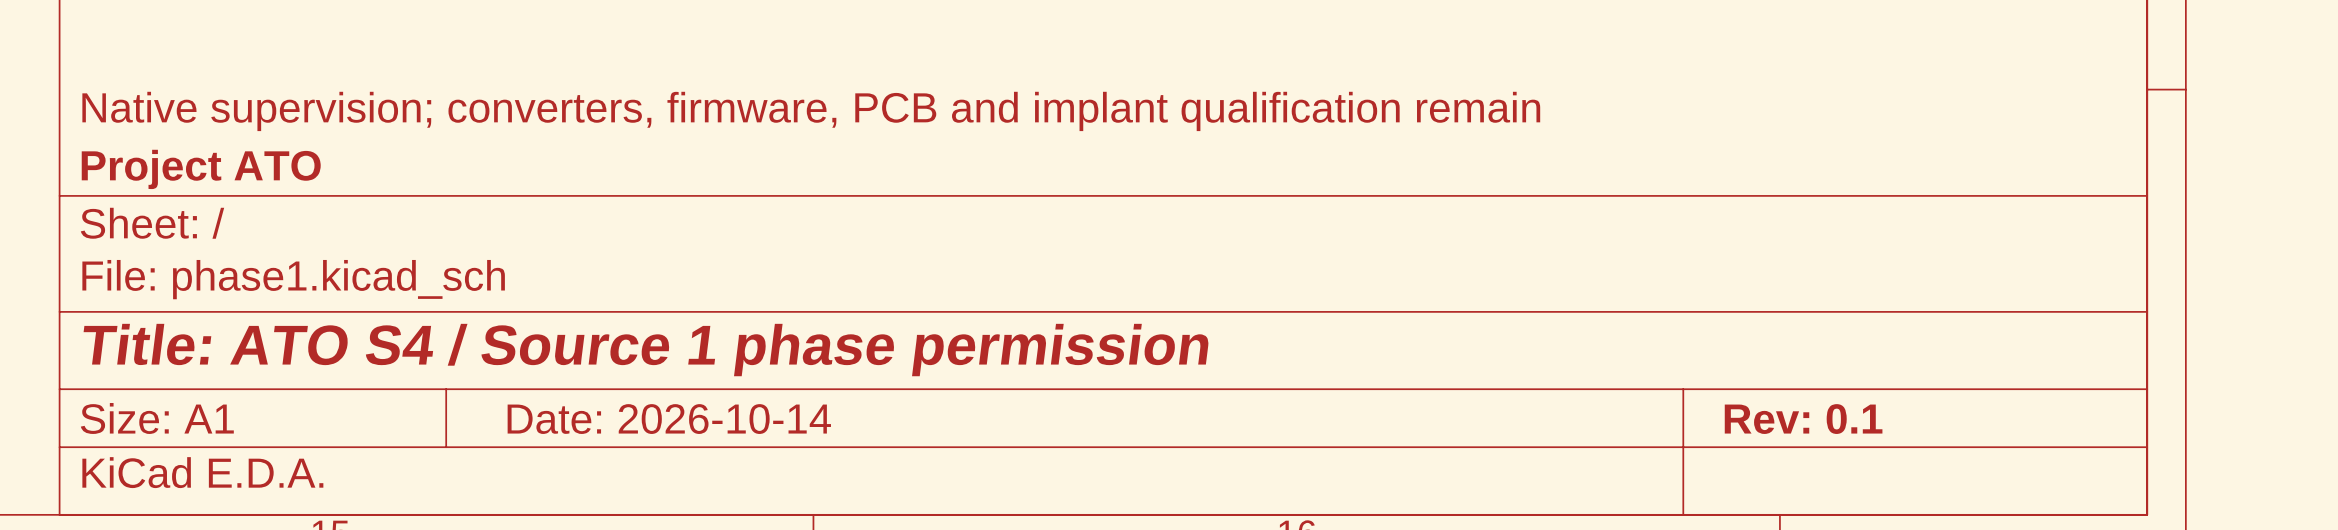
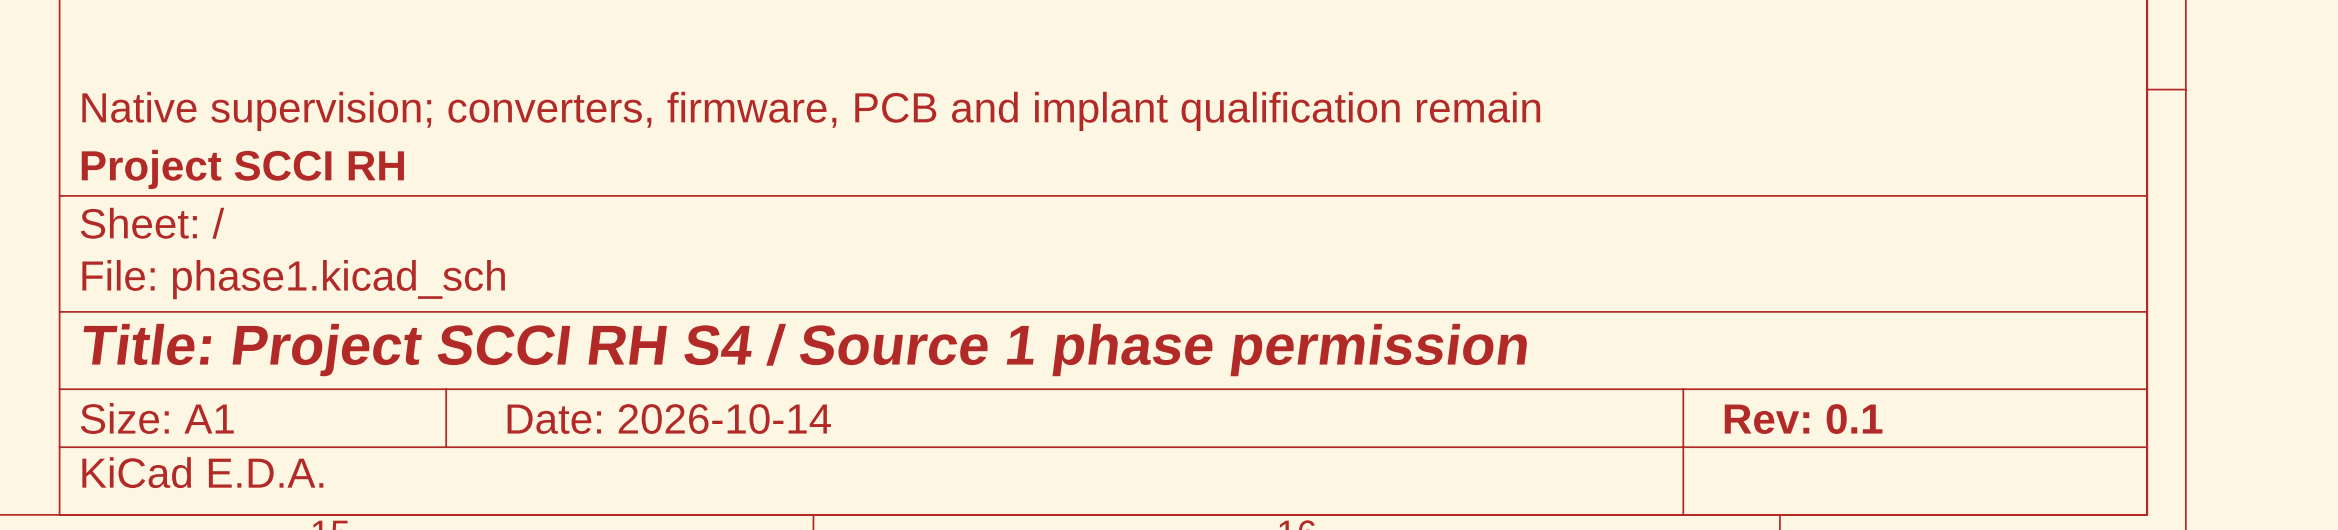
title block: Project ATO (201, 169) -> Project SCCI RH (242, 169)
title block: Title: ATO S4 / Source 1 phase permission (646, 350) -> Title: Project SCCI RH S4 / Source 1 phase permission (805, 350)

